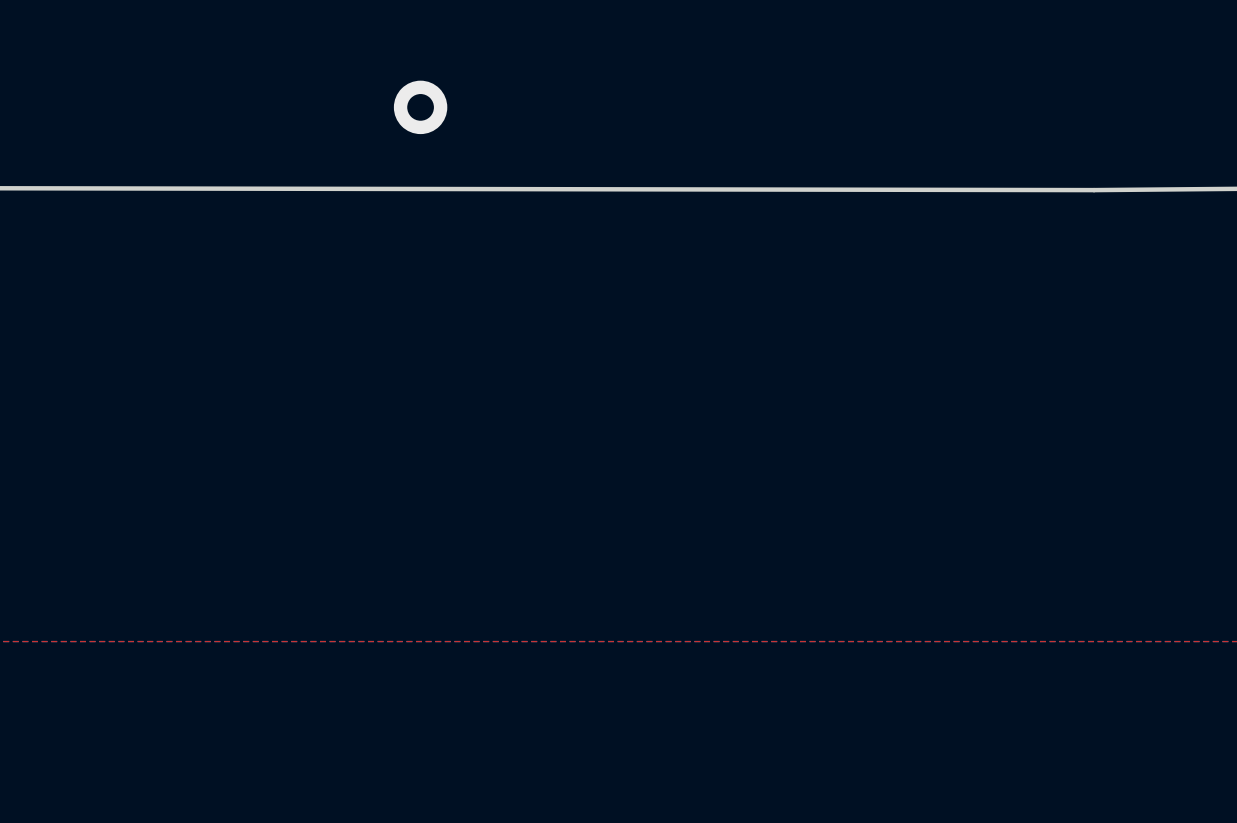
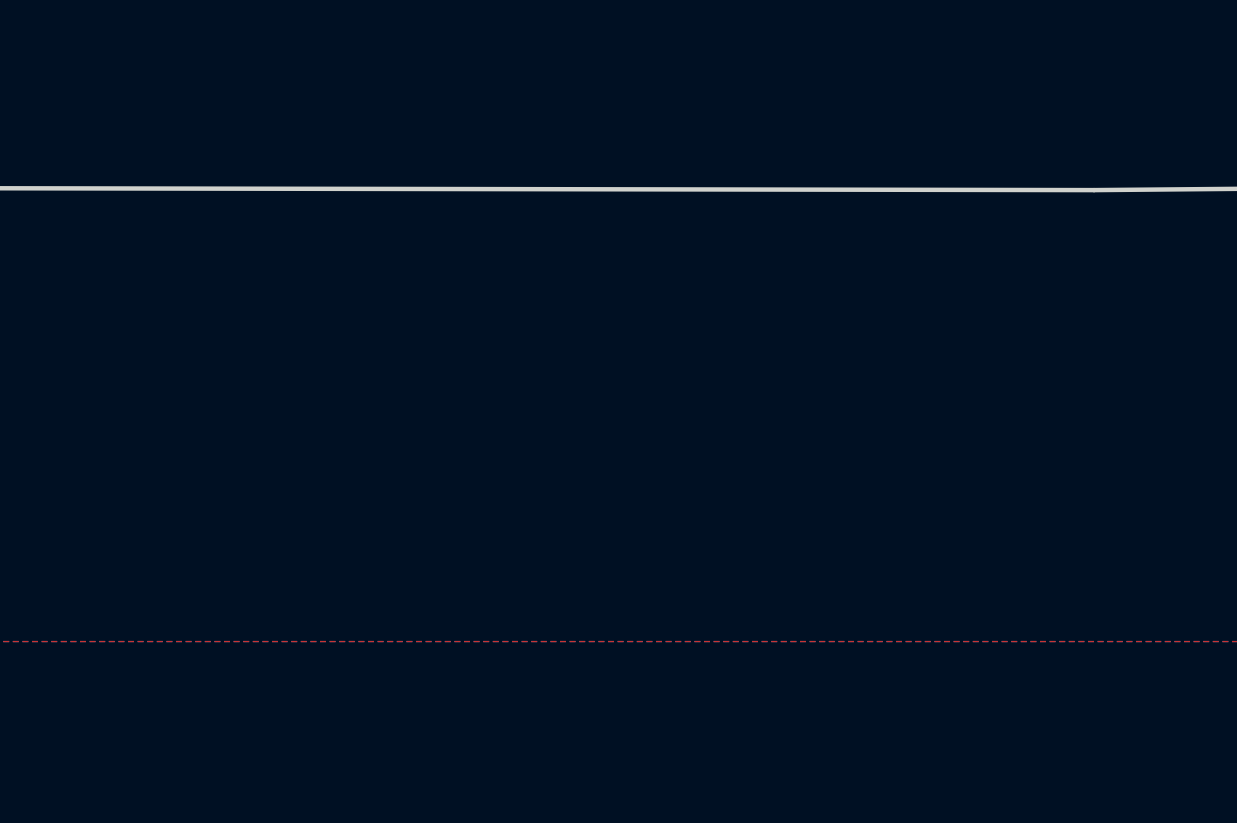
via: (420, 107) -> none

